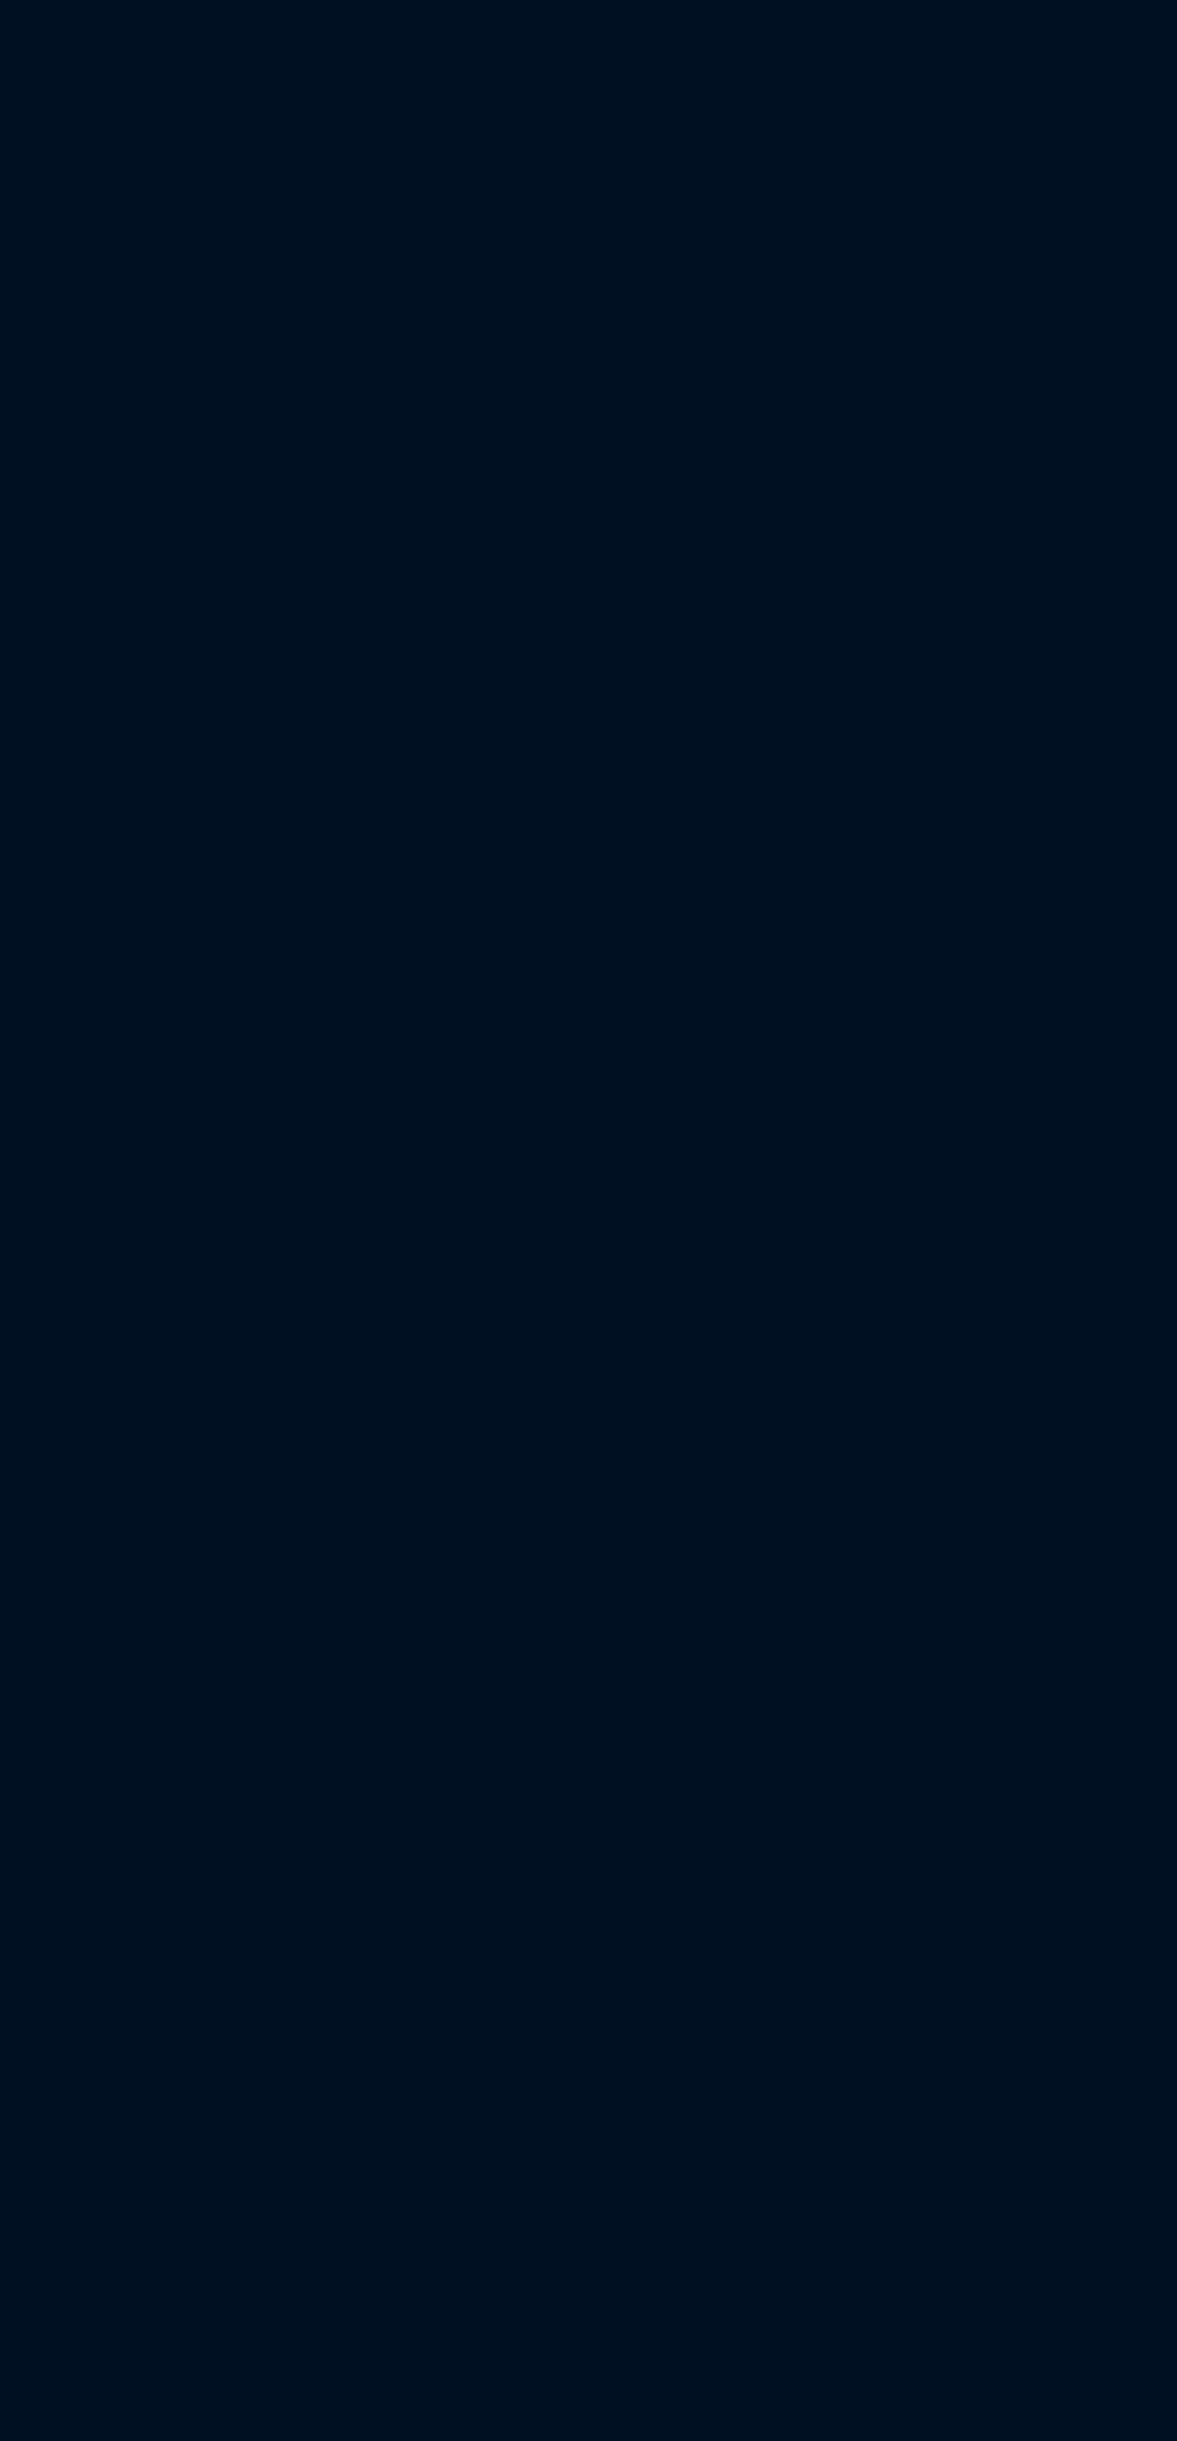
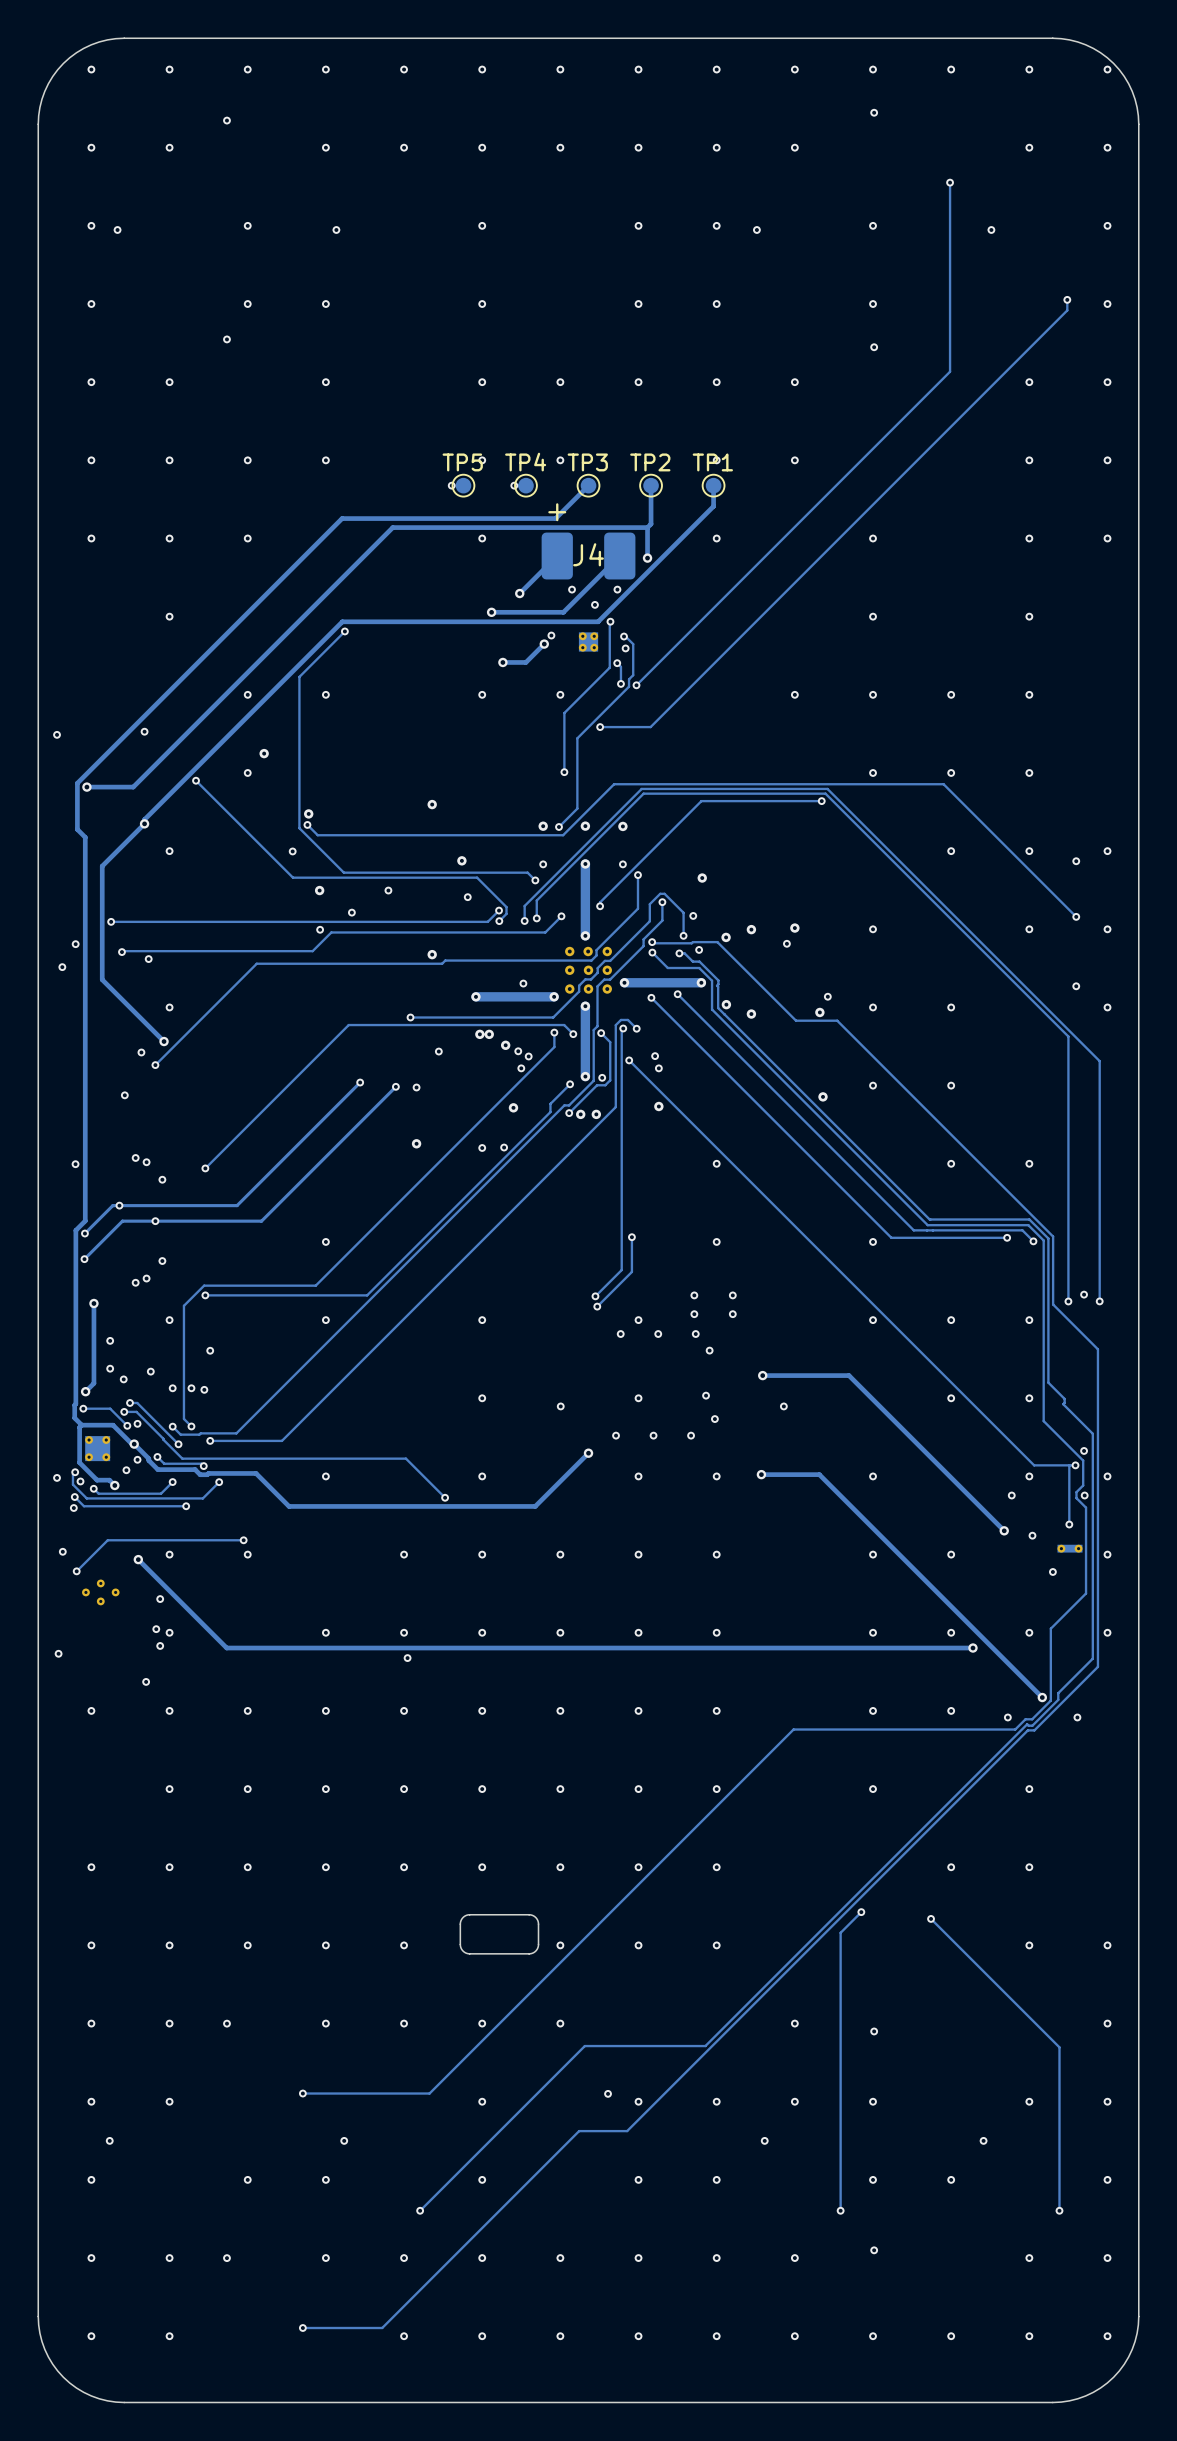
board edge: none -> (1052, 38) (115, 38) (91, 44) (69, 57) (52, 76) (44, 91) (39, 107) (38, 124) (38, 2316) (41, 2341) (52, 2364) (69, 2382) (91, 2395) (107, 2400) (124, 2402) (1052, 2402) (1077, 2398) (1100, 2388) (1119, 2371) (1132, 2349) (1137, 2333) (1138, 2316) (1138, 124) (1137, 107) (1132, 91) (1124, 76) (1113, 63) (1100, 52) (1085, 44) (1069, 39) (1052, 38)
via: none -> (91, 69)
via: none -> (169, 69)
via: none -> (247, 69)
via: none -> (325, 69)
via: none -> (404, 69)
via: none -> (482, 69)
via: none -> (560, 69)
via: none -> (638, 69)
via: none -> (716, 69)
via: none -> (794, 69)
via: none -> (873, 69)
via: none -> (951, 69)
via: none -> (1029, 69)
via: none -> (1107, 69)
via: none -> (874, 112)
via: none -> (226, 120)
via: none -> (91, 147)
via: none -> (169, 147)
via: none -> (325, 147)
via: none -> (404, 147)
via: none -> (482, 147)
via: none -> (560, 147)
via: none -> (638, 147)
via: none -> (716, 147)
via: none -> (794, 147)
via: none -> (1029, 147)
via: none -> (1107, 147)
track: none -> (950, 182) (950, 371) (636, 685)
via: none -> (950, 182)
via: none -> (91, 225)
via: none -> (247, 225)
via: none -> (482, 225)
via: none -> (638, 225)
via: none -> (716, 225)
via: none -> (873, 225)
via: none -> (1107, 225)
via: none -> (117, 229)
via: none -> (336, 229)
via: none -> (756, 229)
via: none -> (991, 229)
track: none -> (1067, 299) (1067, 310) (650, 727) (600, 727)
via: none -> (1067, 299)
via: none -> (91, 304)
via: none -> (247, 304)
via: none -> (325, 304)
via: none -> (482, 304)
via: none -> (638, 304)
via: none -> (716, 304)
via: none -> (873, 304)
via: none -> (1107, 304)
via: none -> (226, 339)
via: none -> (874, 347)
via: none -> (91, 382)
via: none -> (169, 382)
via: none -> (325, 382)
via: none -> (482, 382)
via: none -> (560, 382)
via: none -> (638, 382)
via: none -> (716, 382)
via: none -> (794, 382)
via: none -> (1029, 382)
via: none -> (1107, 382)
via: none -> (91, 460)
via: none -> (169, 460)
via: none -> (247, 460)
via: none -> (325, 460)
via: none -> (482, 460)
via: none -> (560, 460)
via: none -> (716, 460)
via: none -> (794, 460)
via: none -> (1029, 460)
via: none -> (1107, 460)
via: none -> (451, 485)
TP5: none -> (463, 485)
via: none -> (514, 485)
TP4: none -> (525, 485)
track: none -> (588, 485) (555, 518) (342, 518) (77, 783) (77, 829) (85, 837) (85, 1220) (75, 1230) (74, 1405) (74, 1418) (81, 1425)
TP3: none -> (588, 485)
track: none -> (651, 485) (651, 524) (647, 527)
TP2: none -> (651, 485)
track: none -> (713, 485) (713, 506) (598, 621) (342, 621) (144, 819) (144, 823) (102, 866) (102, 979) (164, 1041)
TP1: none -> (713, 485)
track: none -> (647, 527) (392, 527) (133, 787) (86, 787)
track: none -> (647, 527) (647, 558)
via: none -> (91, 538)
via: none -> (169, 538)
via: none -> (247, 538)
via: none -> (482, 538)
via: none -> (716, 538)
via: none -> (873, 538)
via: none -> (1029, 538)
via: none -> (1107, 538)
J4: none -> (588, 541)
track: none -> (557, 556) (519, 593)
track: none -> (619, 556) (563, 612) (491, 612)
via: none -> (647, 558)
via: none -> (572, 589)
via: none -> (617, 589)
via: none -> (519, 593)
via: none -> (594, 604)
via: none -> (491, 612)
via: none -> (169, 616)
via: none -> (873, 616)
via: none -> (1029, 616)
track: none -> (610, 621) (609, 667) (564, 713) (564, 772)
via: none -> (610, 621)
track: none -> (344, 631) (299, 676) (299, 828) (343, 872) (527, 872) (535, 880)
via: none -> (344, 631)
via: none -> (551, 635)
track: none -> (624, 636) (633, 644) (633, 675) (629, 679) (629, 686) (577, 738) (577, 808) (558, 827)
via: none -> (624, 636)
part: none -> (588, 641)
track: none -> (544, 644) (525, 662) (502, 662)
via: none -> (544, 644)
via: none -> (625, 648)
via: none -> (502, 662)
track: none -> (617, 663) (620, 666) (620, 683)
via: none -> (617, 663)
via: none -> (620, 683)
via: none -> (636, 685)
via: none -> (247, 694)
via: none -> (325, 694)
via: none -> (482, 694)
via: none -> (560, 694)
via: none -> (794, 694)
via: none -> (873, 694)
via: none -> (951, 694)
via: none -> (1029, 694)
via: none -> (600, 727)
via: none -> (144, 731)
via: none -> (57, 734)
via: none -> (264, 753)
via: none -> (247, 772)
via: none -> (564, 772)
via: none -> (873, 772)
via: none -> (951, 772)
via: none -> (1029, 772)
track: none -> (196, 780) (292, 877) (477, 877) (506, 907) (506, 913) (499, 921)
via: none -> (196, 780)
via: none -> (86, 787)
track: none -> (821, 801) (701, 801) (600, 902) (600, 906)
via: none -> (821, 801)
via: none -> (432, 804)
via: none -> (308, 813)
via: none -> (144, 823)
track: none -> (307, 824) (317, 835) (563, 835) (614, 784) (943, 784) (1076, 916)
via: none -> (307, 824)
via: none -> (543, 826)
via: none -> (585, 826)
via: none -> (622, 826)
via: none -> (558, 827)
via: none -> (169, 851)
via: none -> (292, 851)
via: none -> (951, 851)
via: none -> (1029, 851)
via: none -> (1107, 851)
via: none -> (461, 860)
via: none -> (1076, 861)
track: none -> (585, 863) (585, 935)
via: none -> (585, 863)
via: none -> (543, 864)
via: none -> (622, 864)
track: none -> (637, 875) (637, 908) (596, 950) (596, 955) (591, 960) (445, 960) (442, 963) (256, 963) (155, 1065)
via: none -> (637, 875)
via: none -> (702, 878)
via: none -> (535, 880)
via: none -> (319, 890)
via: none -> (388, 890)
via: none -> (467, 897)
track: none -> (662, 902) (662, 920) (643, 939) (643, 946) (610, 979) (604, 979) (597, 986) (597, 1026) (593, 1030) (593, 1080) (569, 1105) (564, 1105) (236, 1433) (180, 1434) (172, 1426)
via: none -> (662, 902)
via: none -> (600, 906)
track: none -> (499, 910) (487, 921) (111, 921)
via: none -> (499, 910)
via: none -> (351, 912)
via: none -> (693, 915)
track: none -> (561, 916) (545, 932) (331, 932) (312, 951) (121, 952)
via: none -> (561, 916)
via: none -> (1076, 916)
track: none -> (536, 918) (536, 900) (643, 793) (825, 793) (1068, 1036) (1068, 1301)
via: none -> (536, 918)
track: none -> (524, 920) (524, 905) (641, 788) (827, 788) (1099, 1061) (1099, 1301)
via: none -> (524, 920)
via: none -> (111, 921)
via: none -> (499, 921)
via: none -> (794, 928)
via: none -> (320, 929)
via: none -> (751, 929)
via: none -> (873, 929)
via: none -> (1029, 929)
via: none -> (1107, 929)
via: none -> (585, 935)
track: none -> (683, 935) (683, 912) (664, 893) (660, 893) (649, 904) (649, 921) (610, 960) (604, 960) (591, 979) (585, 979) (579, 985) (579, 991) (553, 1017) (410, 1017)
via: none -> (683, 935)
via: none -> (726, 937)
track: none -> (652, 942) (717, 942) (796, 1020) (837, 1020) (1053, 1236) (1053, 1304) (1097, 1349) (1097, 1666) (1034, 1730) (1027, 1730) (627, 2131) (579, 2131) (382, 2328) (302, 2328)
via: none -> (652, 942)
via: none -> (786, 943)
via: none -> (75, 944)
via: none -> (699, 949)
via: none -> (121, 952)
track: none -> (652, 952) (667, 968) (699, 968) (712, 980) (712, 1009) (927, 1225) (1028, 1225) (1043, 1240) (1043, 1421) (1083, 1460) (1083, 1485) (1076, 1492) (1076, 1498) (1086, 1507) (1086, 1593) (1050, 1628) (1050, 1700) (1032, 1719) (1025, 1719) (1015, 1729) (793, 1729) (429, 2093) (302, 2093)
via: none -> (652, 952)
track: none -> (679, 953) (684, 953) (692, 961) (699, 961) (718, 980) (718, 1008) (930, 1219) (1029, 1219) (1048, 1238) (1048, 1382) (1064, 1398) (1063, 1404) (1092, 1433) (1092, 1658) (1058, 1693) (1058, 1699) (1032, 1725) (1027, 1724) (705, 2046) (584, 2046) (420, 2210)
via: none -> (679, 953)
via: none -> (432, 954)
via: none -> (148, 959)
via: none -> (62, 967)
part: none -> (588, 970)
via: none -> (624, 982)
track: none -> (701, 982) (624, 982)
via: none -> (701, 982)
via: none -> (523, 983)
via: none -> (1076, 986)
track: none -> (677, 994) (913, 1230) (1022, 1230) (1033, 1241)
via: none -> (677, 994)
via: none -> (475, 996)
track: none -> (554, 996) (475, 996)
via: none -> (554, 996)
via: none -> (827, 996)
track: none -> (651, 997) (891, 1237) (1007, 1237)
via: none -> (651, 997)
via: none -> (726, 1004)
track: none -> (585, 1006) (585, 1076)
via: none -> (585, 1006)
via: none -> (169, 1007)
via: none -> (873, 1007)
via: none -> (951, 1007)
via: none -> (1107, 1007)
via: none -> (819, 1012)
via: none -> (751, 1014)
via: none -> (410, 1017)
track: none -> (623, 1028) (621, 1030) (621, 1270) (595, 1296)
via: none -> (623, 1028)
track: none -> (636, 1028) (627, 1019) (620, 1019) (615, 1025) (615, 1107) (281, 1440) (210, 1440)
via: none -> (636, 1028)
track: none -> (554, 1032) (554, 1047) (315, 1285) (204, 1285) (183, 1305) (183, 1418) (191, 1426)
via: none -> (554, 1032)
track: none -> (601, 1033) (610, 1042) (610, 1080) (605, 1085) (597, 1085) (569, 1113)
via: none -> (601, 1033)
via: none -> (479, 1034)
via: none -> (489, 1034)
track: none -> (573, 1034) (564, 1025) (348, 1025) (205, 1168)
via: none -> (573, 1034)
via: none -> (164, 1041)
via: none -> (505, 1045)
via: none -> (438, 1051)
via: none -> (518, 1051)
via: none -> (141, 1052)
via: none -> (528, 1056)
via: none -> (655, 1056)
track: none -> (629, 1060) (1034, 1465) (1075, 1465)
via: none -> (629, 1060)
via: none -> (155, 1065)
via: none -> (521, 1068)
via: none -> (658, 1068)
via: none -> (585, 1076)
via: none -> (602, 1077)
track: none -> (360, 1082) (237, 1205) (112, 1205) (84, 1233)
via: none -> (360, 1082)
track: none -> (570, 1084) (550, 1103) (550, 1112) (367, 1295) (205, 1295)
via: none -> (570, 1084)
via: none -> (873, 1085)
via: none -> (951, 1085)
track: none -> (395, 1086) (261, 1221) (122, 1221) (84, 1259)
via: none -> (395, 1086)
via: none -> (416, 1087)
via: none -> (124, 1095)
via: none -> (823, 1096)
via: none -> (658, 1106)
via: none -> (513, 1107)
via: none -> (569, 1113)
via: none -> (580, 1114)
via: none -> (596, 1114)
via: none -> (416, 1143)
via: none -> (504, 1147)
via: none -> (482, 1148)
via: none -> (135, 1157)
via: none -> (146, 1162)
via: none -> (716, 1163)
via: none -> (951, 1163)
via: none -> (1029, 1163)
via: none -> (75, 1164)
via: none -> (205, 1168)
via: none -> (162, 1179)
via: none -> (119, 1205)
via: none -> (155, 1221)
via: none -> (84, 1233)
track: none -> (631, 1237) (631, 1271) (597, 1306)
via: none -> (631, 1237)
via: none -> (1007, 1237)
via: none -> (325, 1241)
via: none -> (716, 1241)
via: none -> (873, 1241)
via: none -> (1033, 1241)
via: none -> (84, 1259)
via: none -> (162, 1261)
via: none -> (146, 1278)
via: none -> (135, 1282)
via: none -> (1084, 1294)
via: none -> (205, 1295)
via: none -> (694, 1295)
via: none -> (732, 1295)
via: none -> (595, 1296)
via: none -> (1068, 1301)
via: none -> (1099, 1301)
track: none -> (93, 1303) (93, 1383) (85, 1391)
via: none -> (93, 1303)
via: none -> (597, 1306)
via: none -> (694, 1314)
via: none -> (732, 1314)
via: none -> (169, 1320)
via: none -> (325, 1320)
via: none -> (482, 1320)
via: none -> (638, 1320)
via: none -> (873, 1320)
via: none -> (951, 1320)
via: none -> (1029, 1320)
via: none -> (620, 1334)
via: none -> (658, 1334)
via: none -> (695, 1334)
via: none -> (110, 1340)
via: none -> (210, 1350)
via: none -> (709, 1350)
via: none -> (110, 1368)
via: none -> (150, 1371)
track: none -> (762, 1375) (848, 1375) (1004, 1530)
via: none -> (762, 1375)
via: none -> (123, 1379)
via: none -> (172, 1388)
via: none -> (191, 1388)
via: none -> (204, 1389)
via: none -> (85, 1391)
via: none -> (706, 1395)
via: none -> (482, 1398)
via: none -> (638, 1398)
via: none -> (951, 1398)
via: none -> (1029, 1398)
track: none -> (130, 1402) (137, 1402) (178, 1444)
via: none -> (130, 1402)
via: none -> (560, 1406)
via: none -> (783, 1406)
track: none -> (83, 1408) (110, 1408) (127, 1425)
via: none -> (83, 1408)
track: none -> (124, 1411) (136, 1411) (182, 1458) (405, 1458) (445, 1497)
via: none -> (124, 1411)
via: none -> (714, 1419)
via: none -> (137, 1423)
track: none -> (81, 1425) (79, 1427) (79, 1462) (97, 1480) (109, 1480) (114, 1485)
track: none -> (81, 1425) (113, 1425) (157, 1469) (195, 1469) (200, 1474) (256, 1473) (289, 1506) (535, 1506) (588, 1453)
via: none -> (127, 1425)
via: none -> (172, 1426)
via: none -> (191, 1426)
via: none -> (616, 1435)
via: none -> (653, 1435)
via: none -> (691, 1435)
via: none -> (210, 1440)
via: none -> (134, 1444)
via: none -> (178, 1444)
part: none -> (97, 1448)
via: none -> (1084, 1450)
via: none -> (588, 1453)
track: none -> (157, 1456) (164, 1463) (201, 1463) (203, 1466)
via: none -> (157, 1456)
via: none -> (137, 1459)
track: none -> (1069, 1465) (1069, 1524)
via: none -> (1075, 1465)
via: none -> (203, 1466)
via: none -> (126, 1470)
track: none -> (75, 1472) (72, 1474) (72, 1484) (86, 1498) (202, 1498) (219, 1482)
via: none -> (75, 1472)
track: none -> (761, 1474) (819, 1474) (1042, 1697)
via: none -> (761, 1474)
via: none -> (325, 1476)
via: none -> (482, 1476)
via: none -> (638, 1476)
via: none -> (716, 1476)
via: none -> (873, 1476)
via: none -> (1029, 1476)
via: none -> (1107, 1476)
via: none -> (57, 1477)
via: none -> (80, 1481)
track: none -> (172, 1482) (161, 1493) (98, 1493) (93, 1488)
via: none -> (172, 1482)
via: none -> (219, 1482)
via: none -> (114, 1485)
via: none -> (93, 1488)
via: none -> (1011, 1495)
via: none -> (1084, 1495)
track: none -> (74, 1497) (84, 1506) (186, 1506)
via: none -> (74, 1497)
via: none -> (445, 1497)
via: none -> (186, 1506)
via: none -> (73, 1508)
via: none -> (1069, 1524)
via: none -> (1004, 1530)
via: none -> (1032, 1535)
track: none -> (243, 1540) (107, 1540) (76, 1571)
via: none -> (243, 1540)
part: none -> (1069, 1548)
via: none -> (62, 1551)
via: none -> (169, 1554)
via: none -> (247, 1554)
via: none -> (404, 1554)
via: none -> (482, 1554)
via: none -> (560, 1554)
via: none -> (638, 1554)
via: none -> (716, 1554)
via: none -> (873, 1554)
via: none -> (951, 1554)
via: none -> (1107, 1554)
track: none -> (138, 1559) (226, 1648) (972, 1648)
via: none -> (138, 1559)
via: none -> (76, 1571)
via: none -> (1052, 1571)
part: none -> (100, 1592)
via: none -> (160, 1599)
via: none -> (156, 1629)
via: none -> (169, 1632)
via: none -> (325, 1632)
via: none -> (404, 1632)
via: none -> (482, 1632)
via: none -> (560, 1632)
via: none -> (638, 1632)
via: none -> (716, 1632)
via: none -> (873, 1632)
via: none -> (951, 1632)
via: none -> (1029, 1632)
via: none -> (1107, 1632)
via: none -> (160, 1645)
via: none -> (972, 1648)
via: none -> (58, 1653)
via: none -> (407, 1658)
via: none -> (146, 1681)
via: none -> (1042, 1697)
via: none -> (91, 1710)
via: none -> (169, 1710)
via: none -> (247, 1710)
via: none -> (325, 1710)
via: none -> (404, 1710)
via: none -> (482, 1710)
via: none -> (560, 1710)
via: none -> (638, 1710)
via: none -> (716, 1710)
via: none -> (873, 1710)
via: none -> (951, 1710)
via: none -> (1007, 1717)
via: none -> (1077, 1717)
via: none -> (169, 1789)
via: none -> (247, 1789)
via: none -> (325, 1789)
via: none -> (404, 1789)
via: none -> (482, 1789)
via: none -> (560, 1789)
via: none -> (638, 1789)
via: none -> (716, 1789)
via: none -> (873, 1789)
via: none -> (1029, 1789)
via: none -> (91, 1867)
via: none -> (169, 1867)
via: none -> (247, 1867)
via: none -> (325, 1867)
via: none -> (404, 1867)
via: none -> (482, 1867)
via: none -> (560, 1867)
via: none -> (638, 1867)
via: none -> (716, 1867)
via: none -> (951, 1867)
via: none -> (1029, 1867)
track: none -> (861, 1912) (840, 1932) (840, 2210)
via: none -> (861, 1912)
board edge: none -> (529, 1914) (465, 1915) (460, 1923) (461, 1949) (469, 1953) (533, 1952) (538, 1946) (538, 1923) (535, 1917) (529, 1914)
track: none -> (931, 1918) (1059, 2047) (1059, 2210)
via: none -> (931, 1918)
via: none -> (91, 1945)
via: none -> (169, 1945)
via: none -> (247, 1945)
via: none -> (325, 1945)
via: none -> (404, 1945)
via: none -> (560, 1945)
via: none -> (638, 1945)
via: none -> (716, 1945)
via: none -> (1029, 1945)
via: none -> (1107, 1945)
via: none -> (91, 2023)
via: none -> (169, 2023)
via: none -> (226, 2023)
via: none -> (325, 2023)
via: none -> (404, 2023)
via: none -> (482, 2023)
via: none -> (560, 2023)
via: none -> (794, 2023)
via: none -> (1107, 2023)
via: none -> (874, 2031)
via: none -> (302, 2093)
via: none -> (608, 2093)
via: none -> (91, 2101)
via: none -> (169, 2101)
via: none -> (482, 2101)
via: none -> (638, 2101)
via: none -> (716, 2101)
via: none -> (794, 2101)
via: none -> (873, 2101)
via: none -> (1029, 2101)
via: none -> (1107, 2101)
via: none -> (109, 2140)
via: none -> (344, 2140)
via: none -> (764, 2140)
via: none -> (983, 2140)
via: none -> (91, 2179)
via: none -> (247, 2179)
via: none -> (325, 2179)
via: none -> (482, 2179)
via: none -> (638, 2179)
via: none -> (716, 2179)
via: none -> (873, 2179)
via: none -> (951, 2179)
via: none -> (1107, 2179)
via: none -> (420, 2210)
via: none -> (840, 2210)
via: none -> (1059, 2210)
via: none -> (874, 2250)
via: none -> (91, 2258)
via: none -> (169, 2258)
via: none -> (226, 2258)
via: none -> (325, 2258)
via: none -> (404, 2258)
via: none -> (482, 2258)
via: none -> (560, 2258)
via: none -> (638, 2258)
via: none -> (716, 2258)
via: none -> (794, 2258)
via: none -> (1029, 2258)
via: none -> (1107, 2258)
via: none -> (302, 2328)
via: none -> (91, 2336)
via: none -> (169, 2336)
via: none -> (404, 2336)
via: none -> (482, 2336)
via: none -> (560, 2336)
via: none -> (638, 2336)
via: none -> (716, 2336)
via: none -> (794, 2336)
via: none -> (873, 2336)
via: none -> (951, 2336)
via: none -> (1029, 2336)
via: none -> (1107, 2336)

